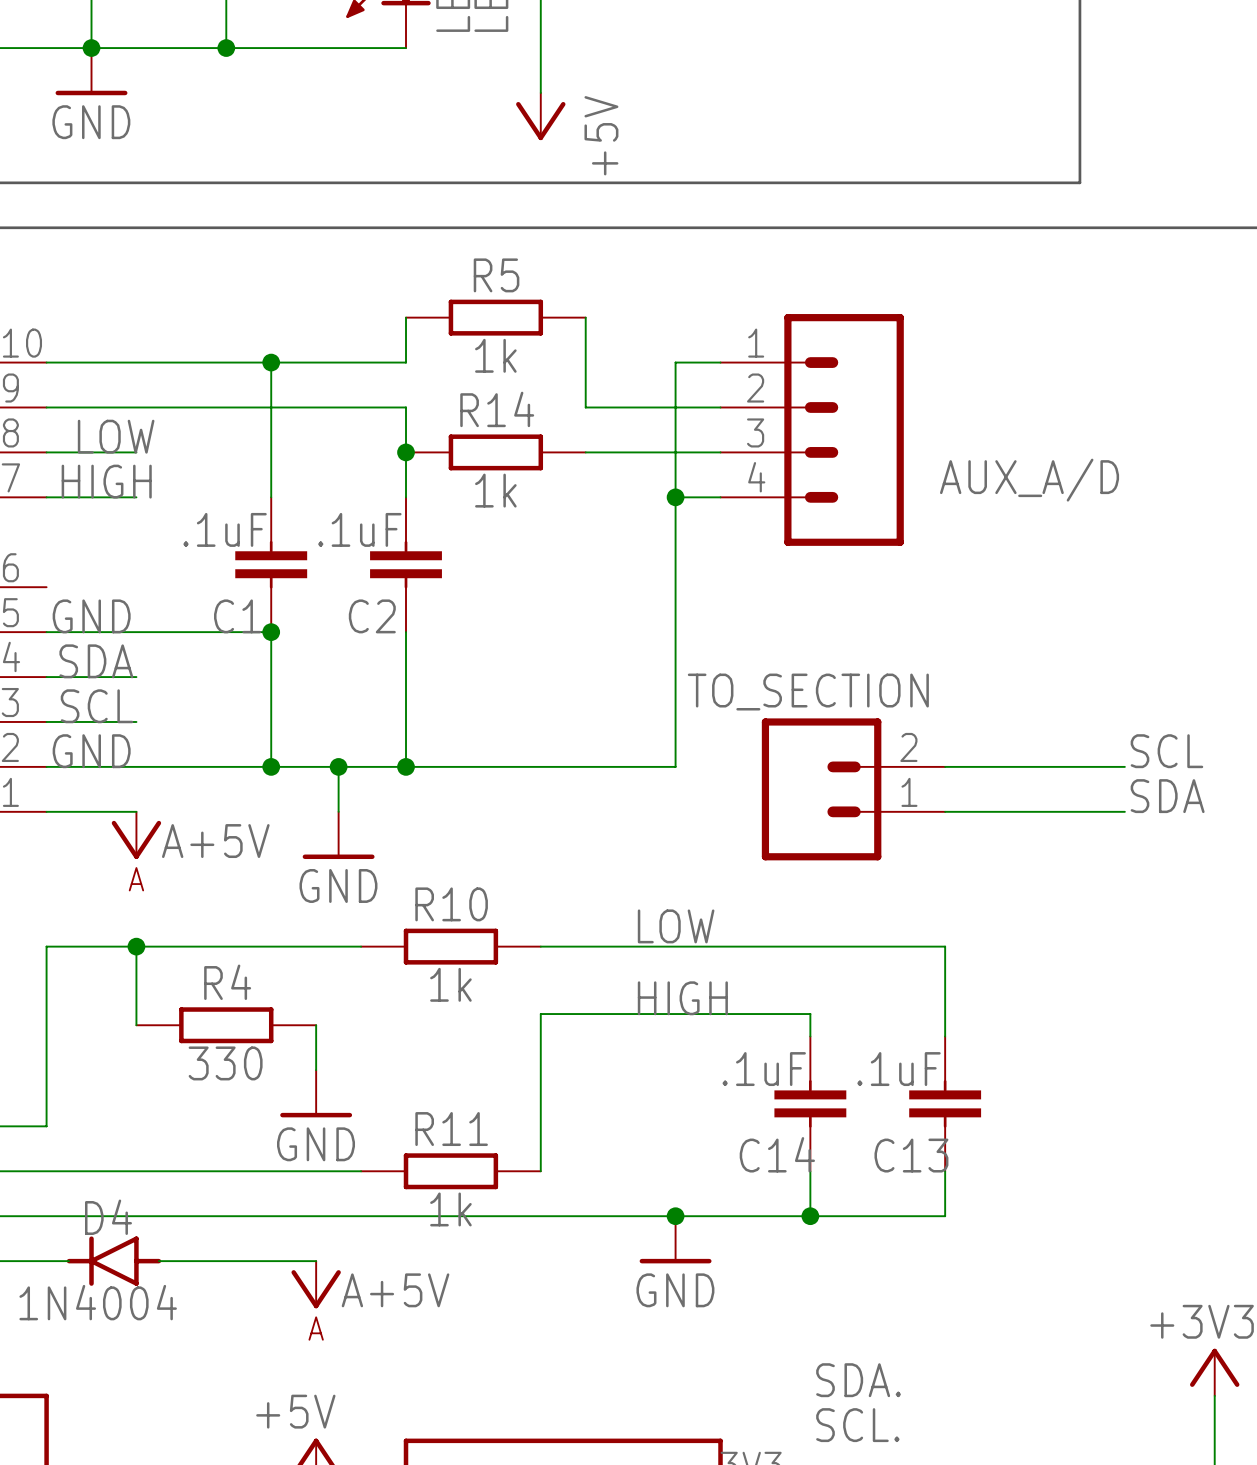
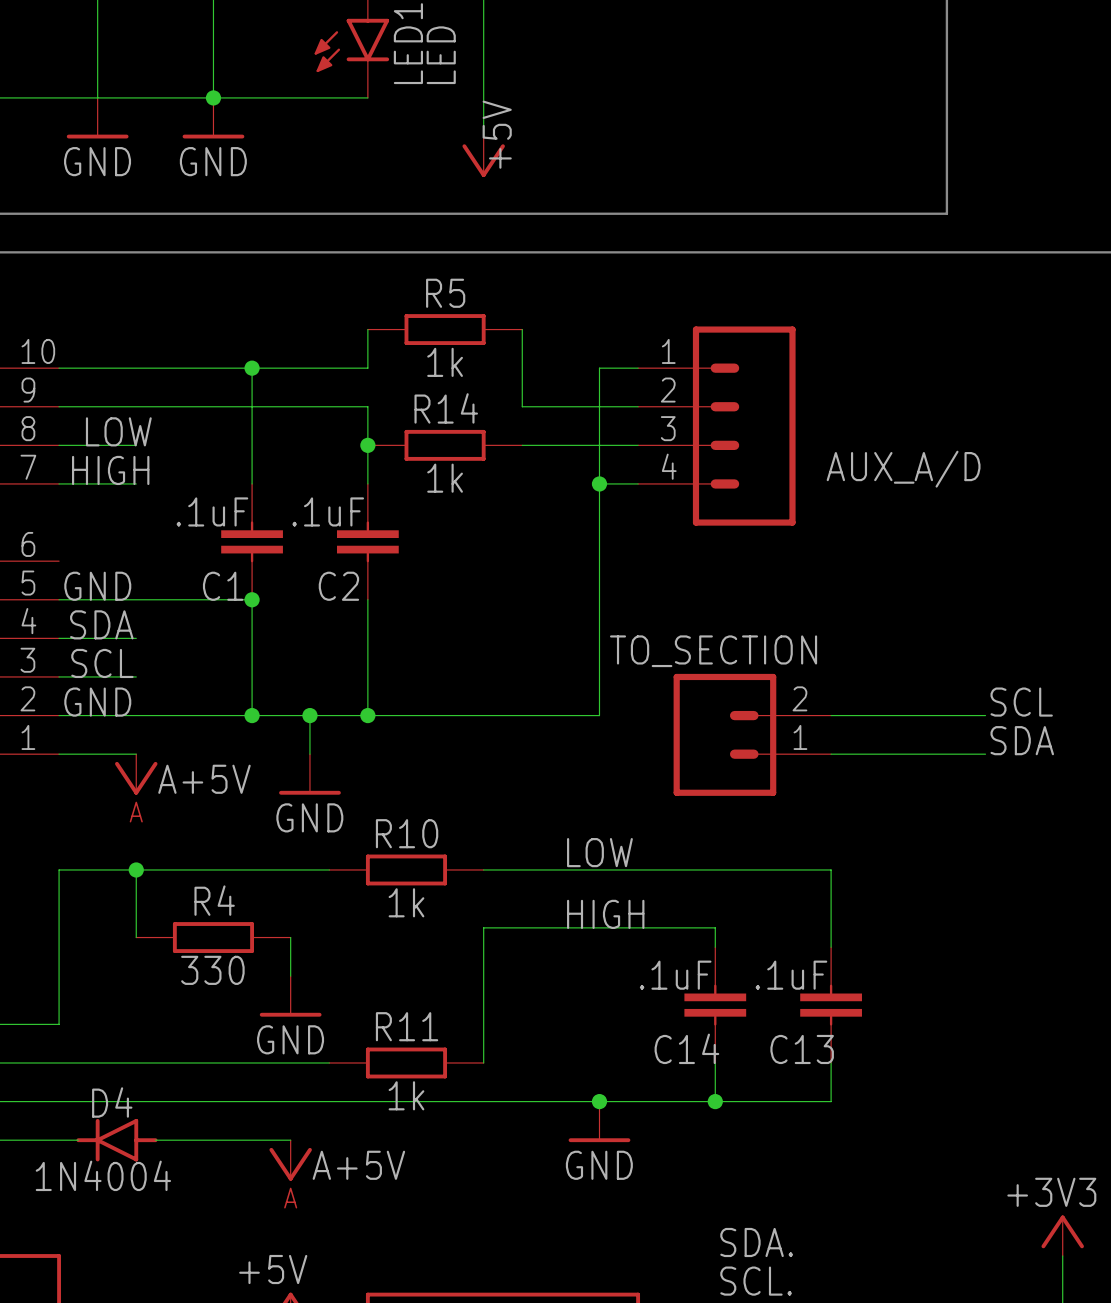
junction: (91, 48) -> none
power symbol: none -> GND (213, 118)
power symbol text position: +5V (601, 135) -> +5V (497, 134)

